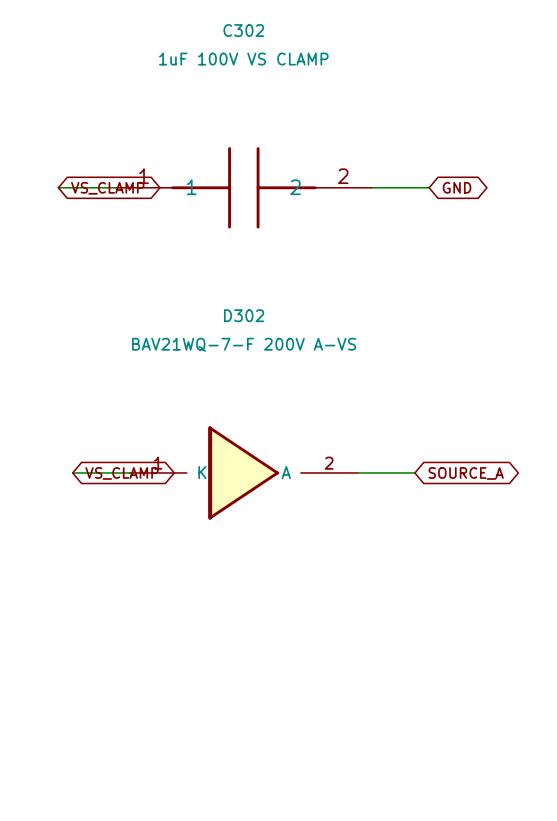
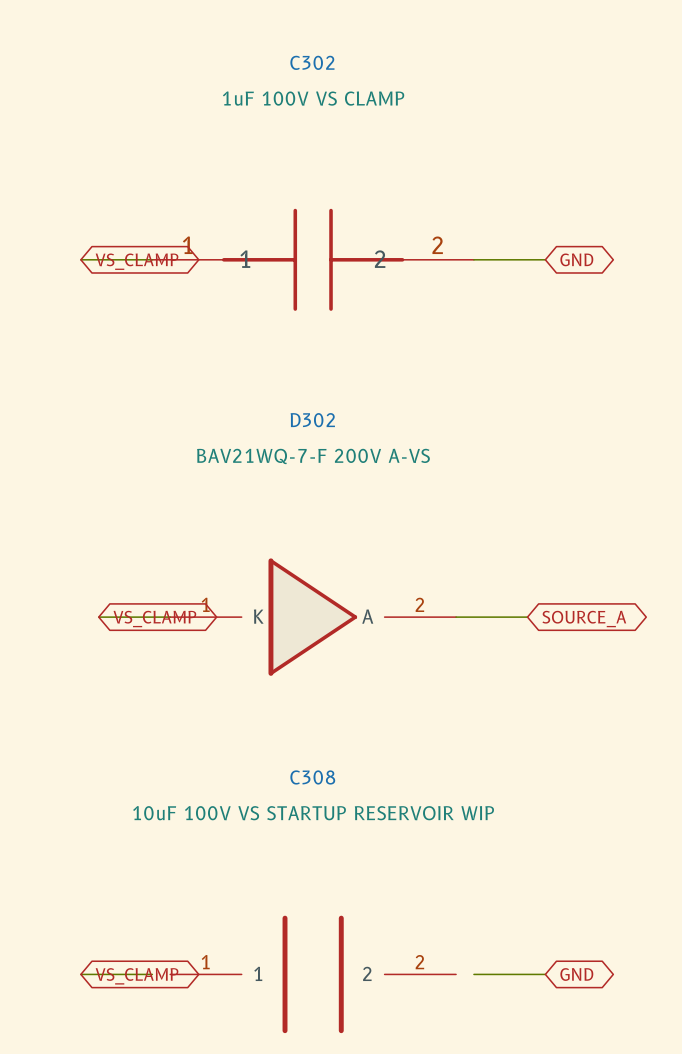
wire: none -> (80, 974) (152, 974)
global label: none -> VS_CLAMP (137, 976)
C308: none -> 10uF 100V VS STARTUP RESERVOIR WIP (313, 974)
wire: none -> (473, 974) (545, 974)
global label: none -> GND (576, 974)

